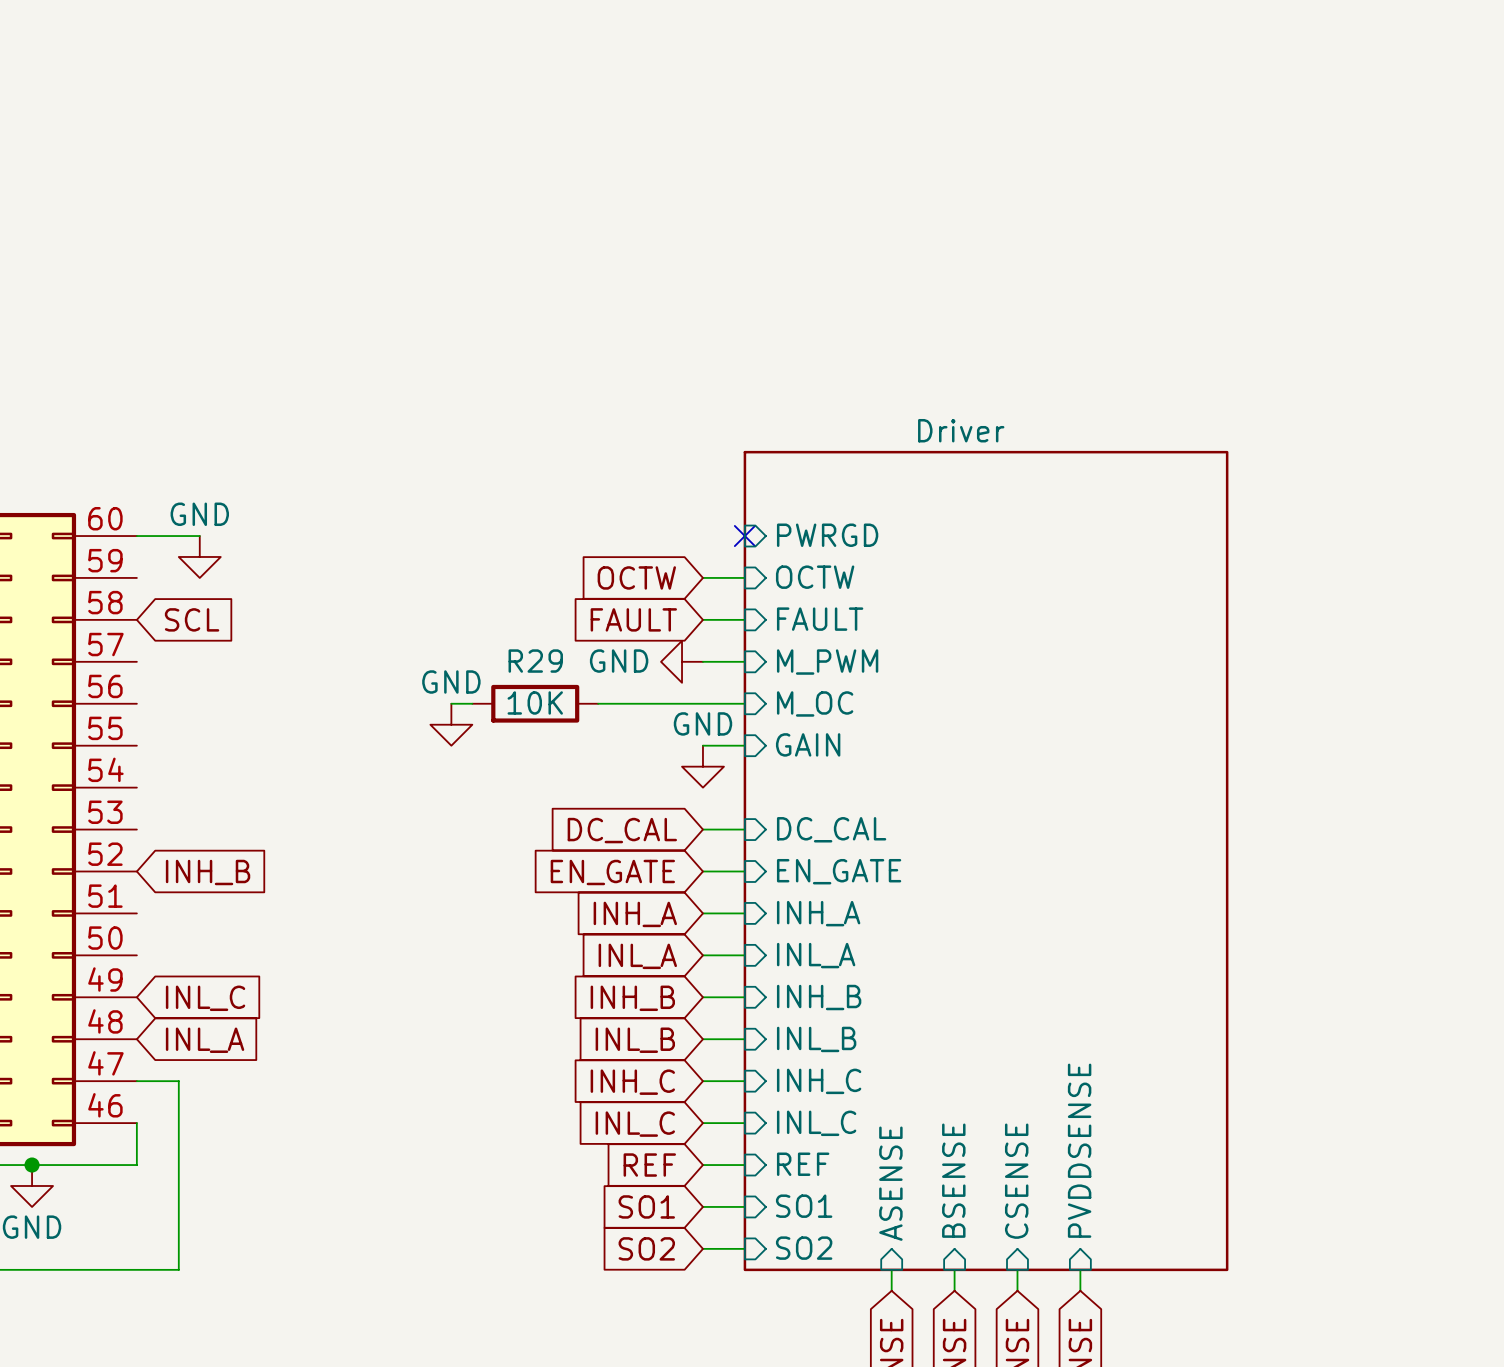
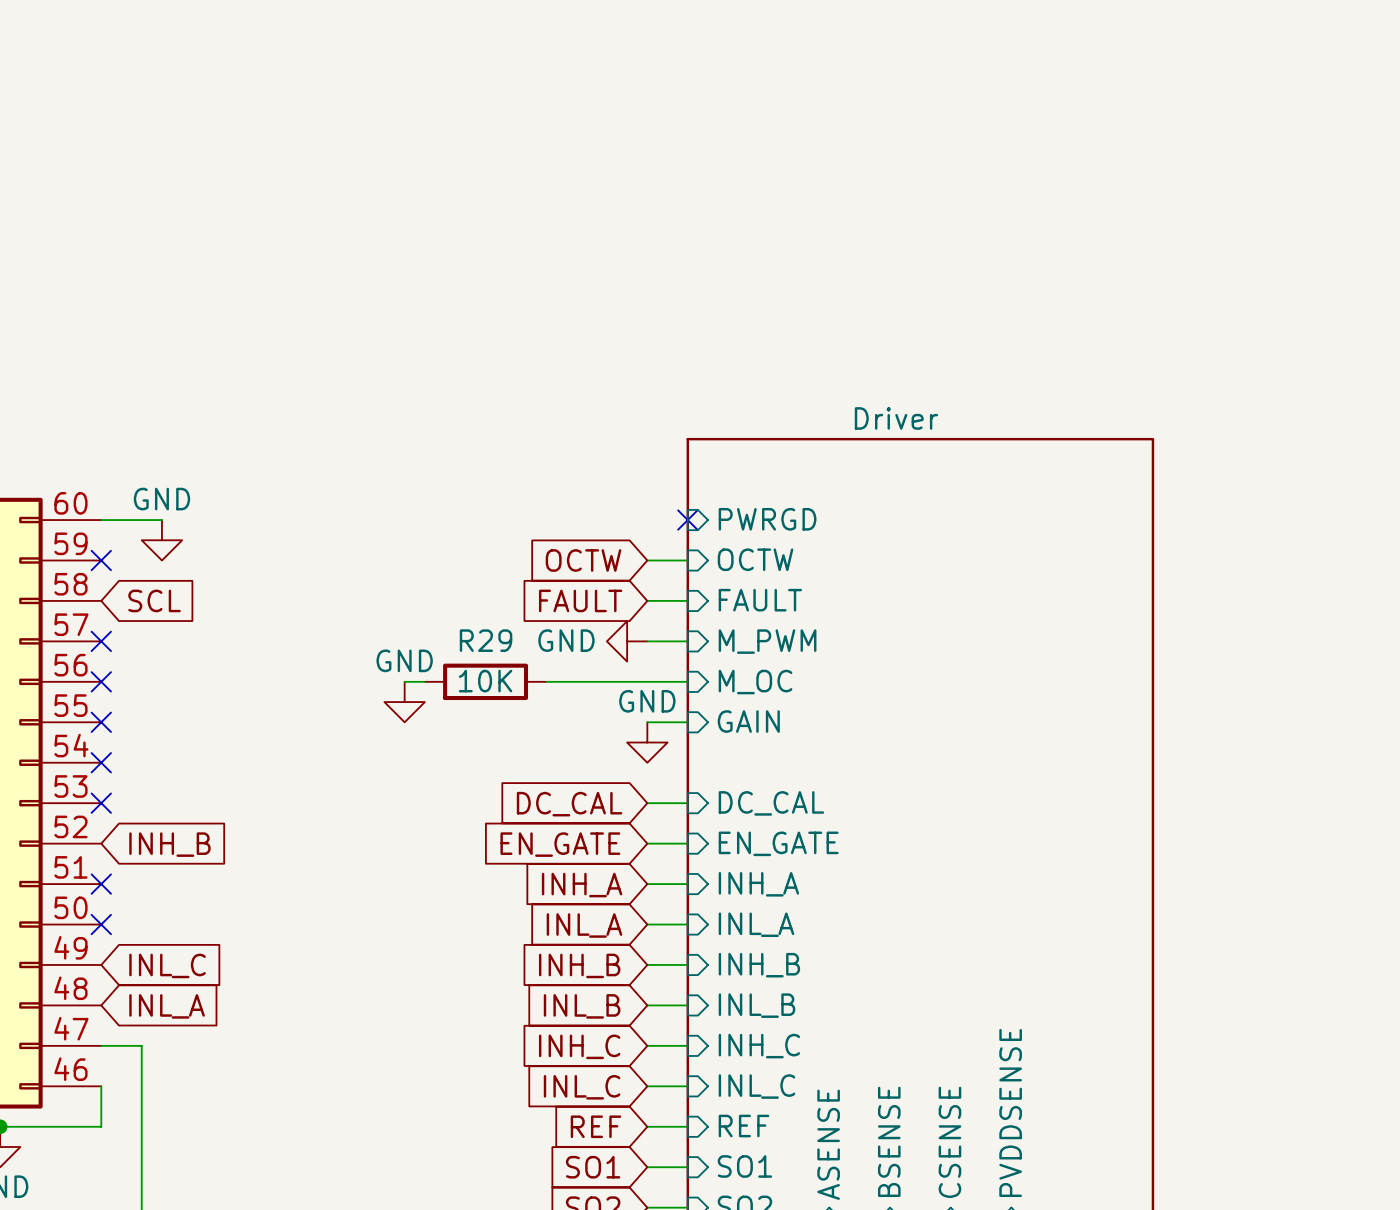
no-connect mark: none -> (101, 560)
no-connect mark: none -> (101, 641)
no-connect mark: none -> (101, 681)
no-connect mark: none -> (101, 722)
no-connect mark: none -> (101, 762)
no-connect mark: none -> (101, 803)
no-connect mark: none -> (101, 884)
no-connect mark: none -> (101, 924)

